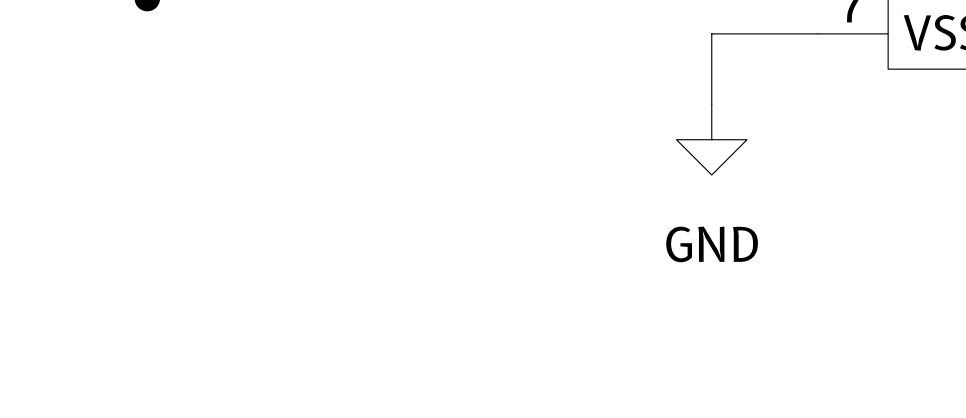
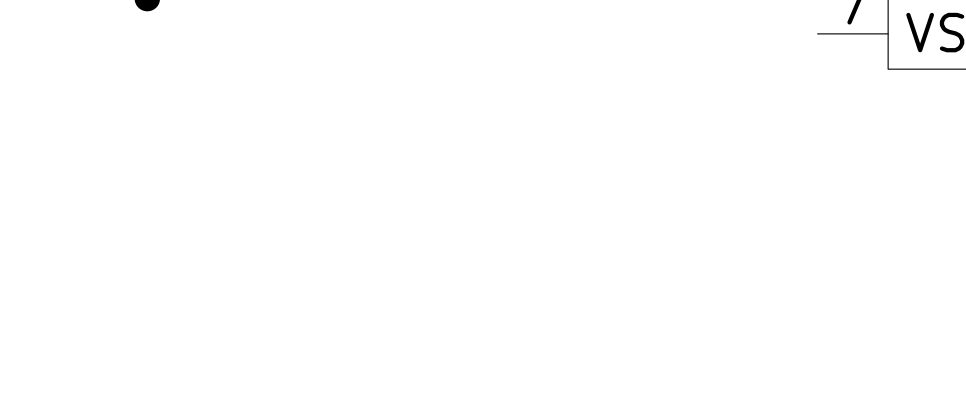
wire: (817, 33) (711, 33) (711, 104) -> none
power symbol: GND (711, 139) -> none

